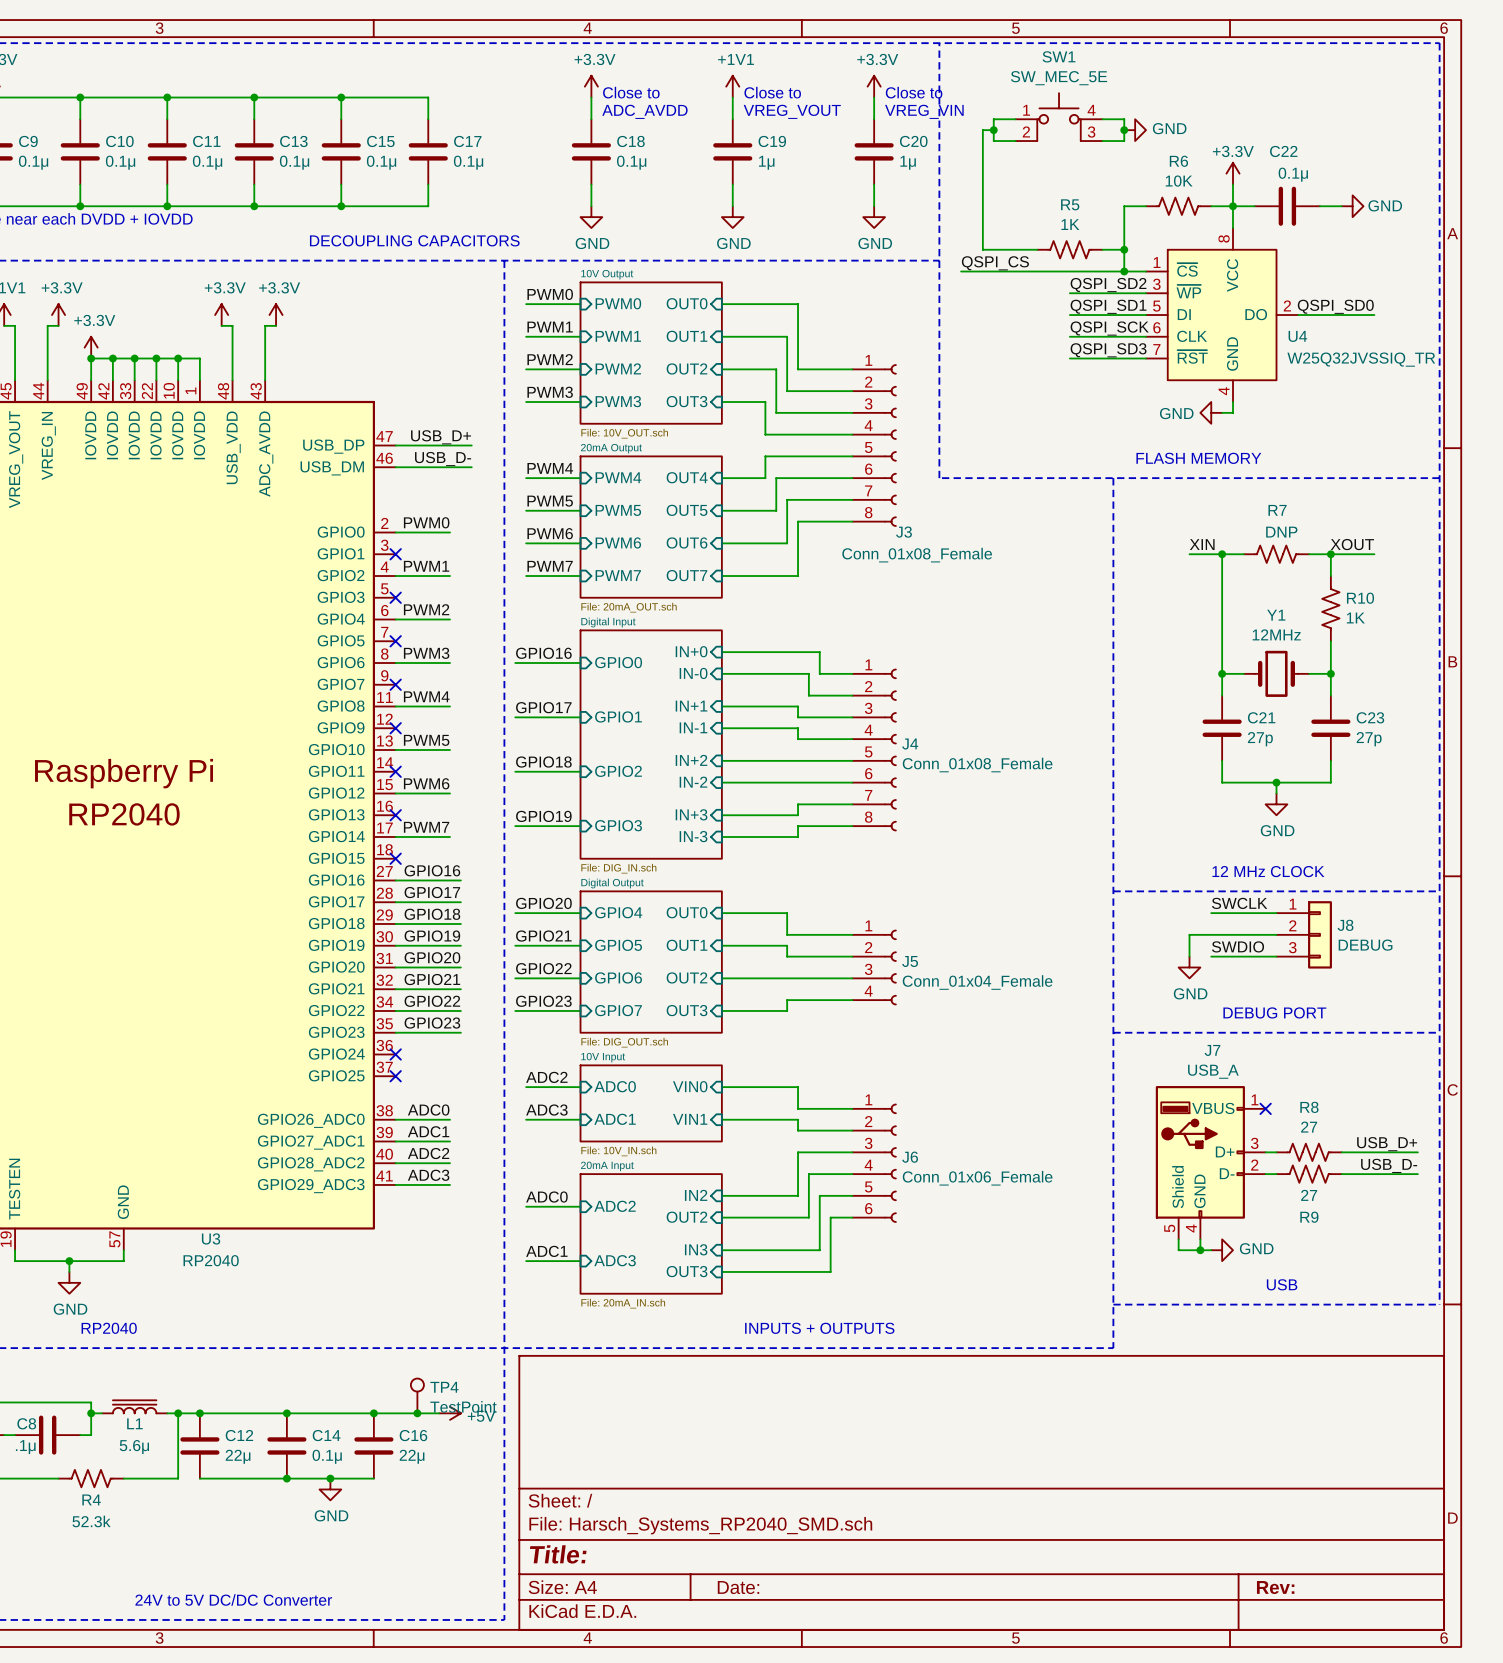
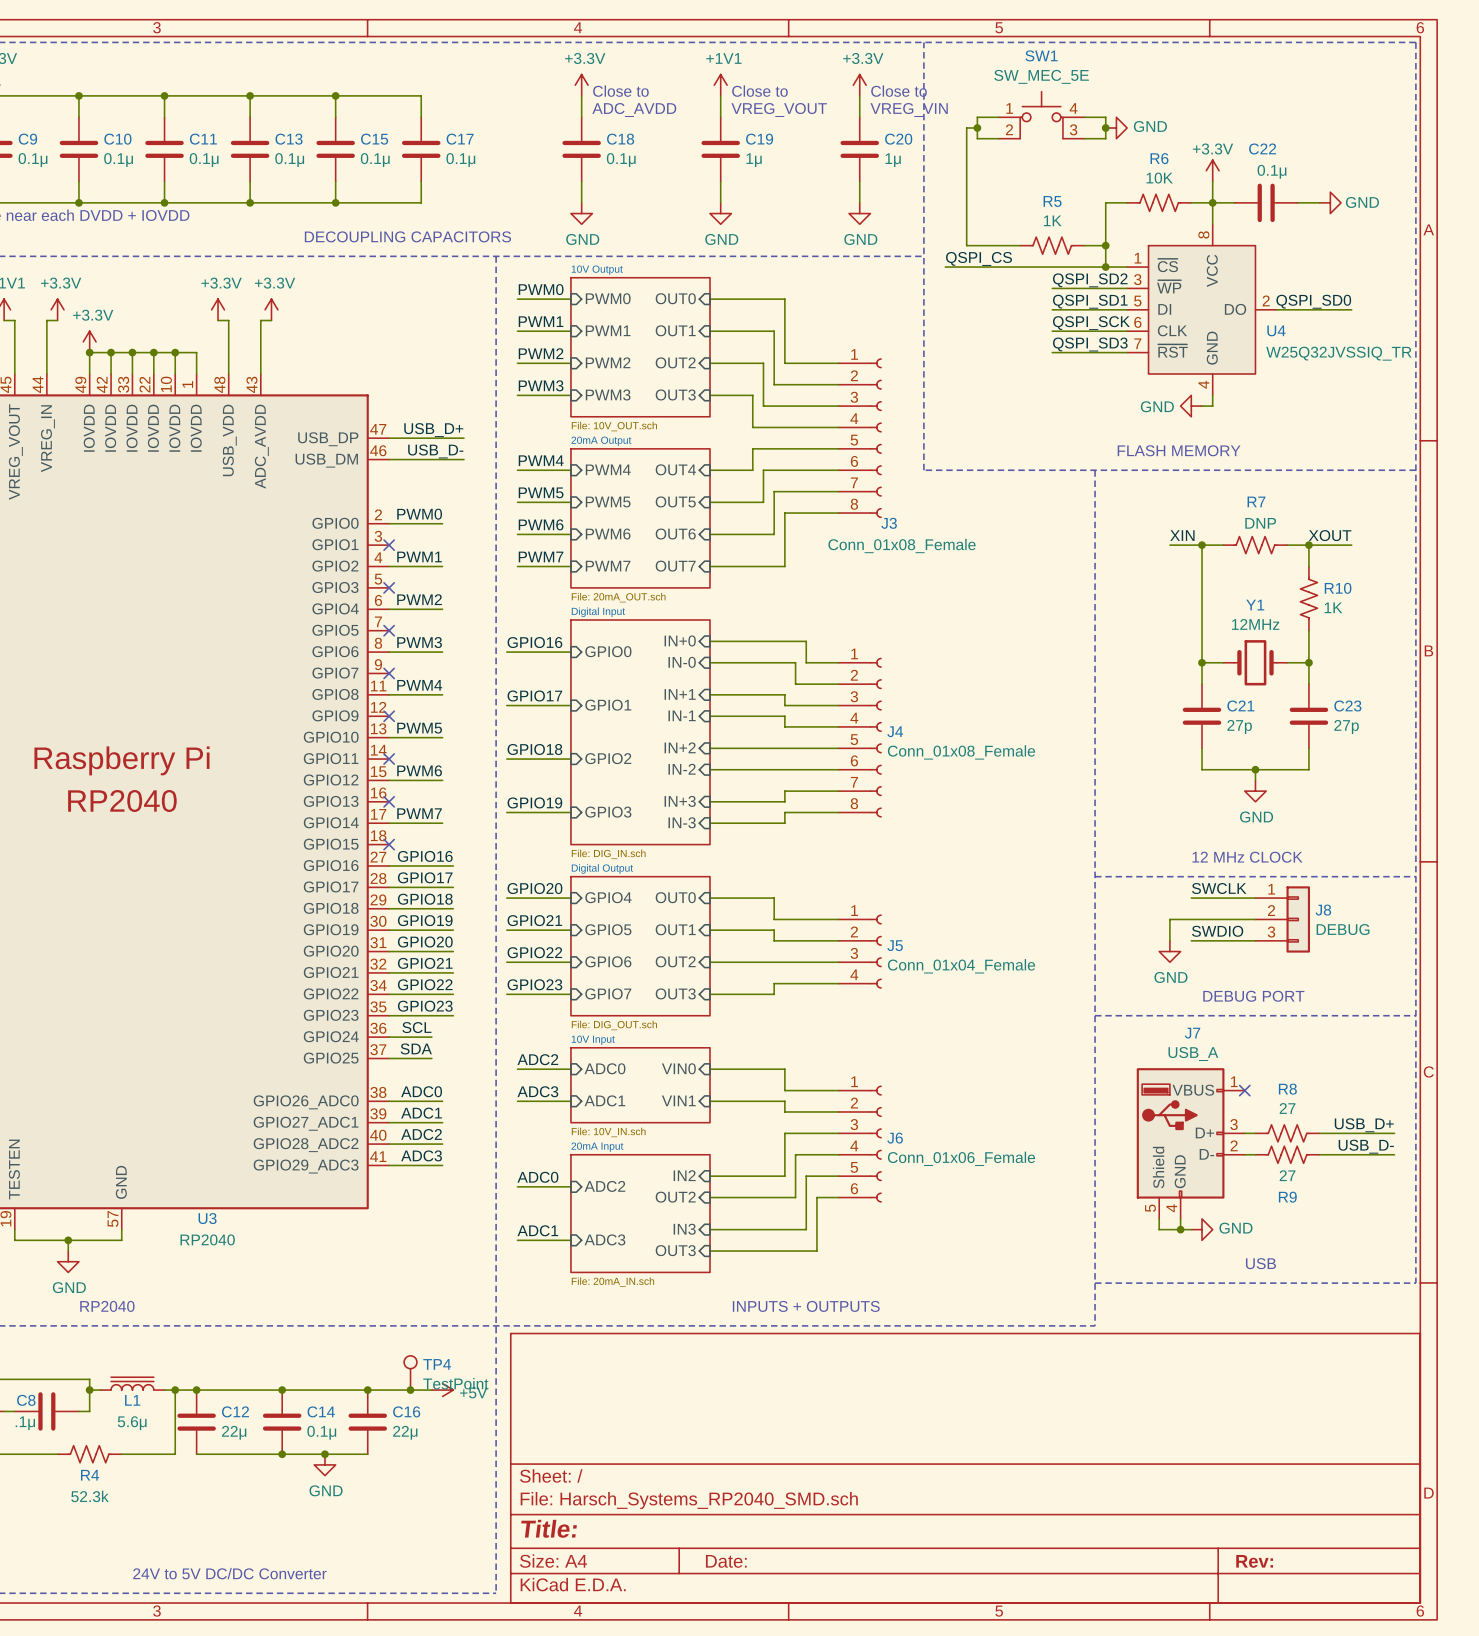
label: none -> SCL (416, 1027)
wire: none -> (389, 1037) (431, 1037)
no-connect mark: (395, 1054) -> none
label: none -> SDA (416, 1048)
wire: none -> (389, 1058) (431, 1058)
no-connect mark: (395, 1076) -> none

